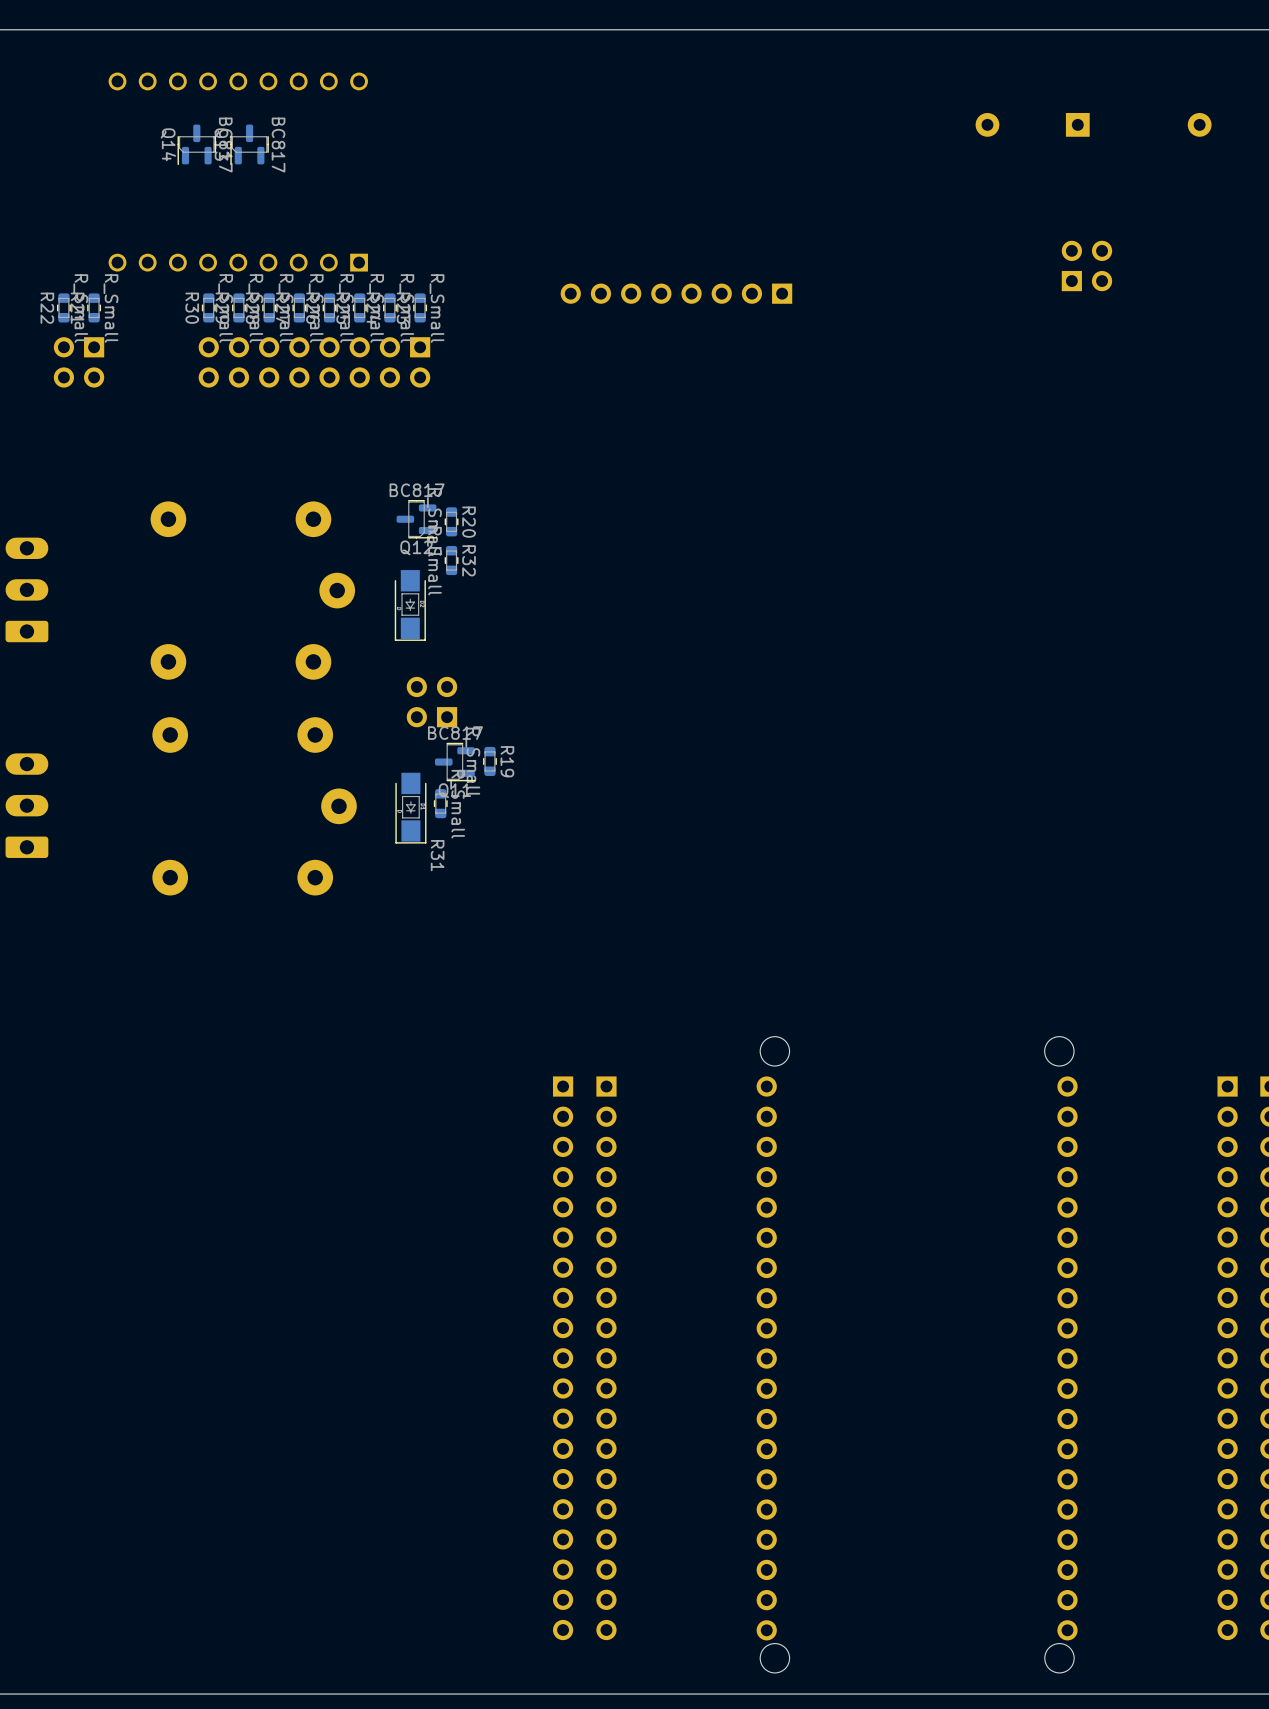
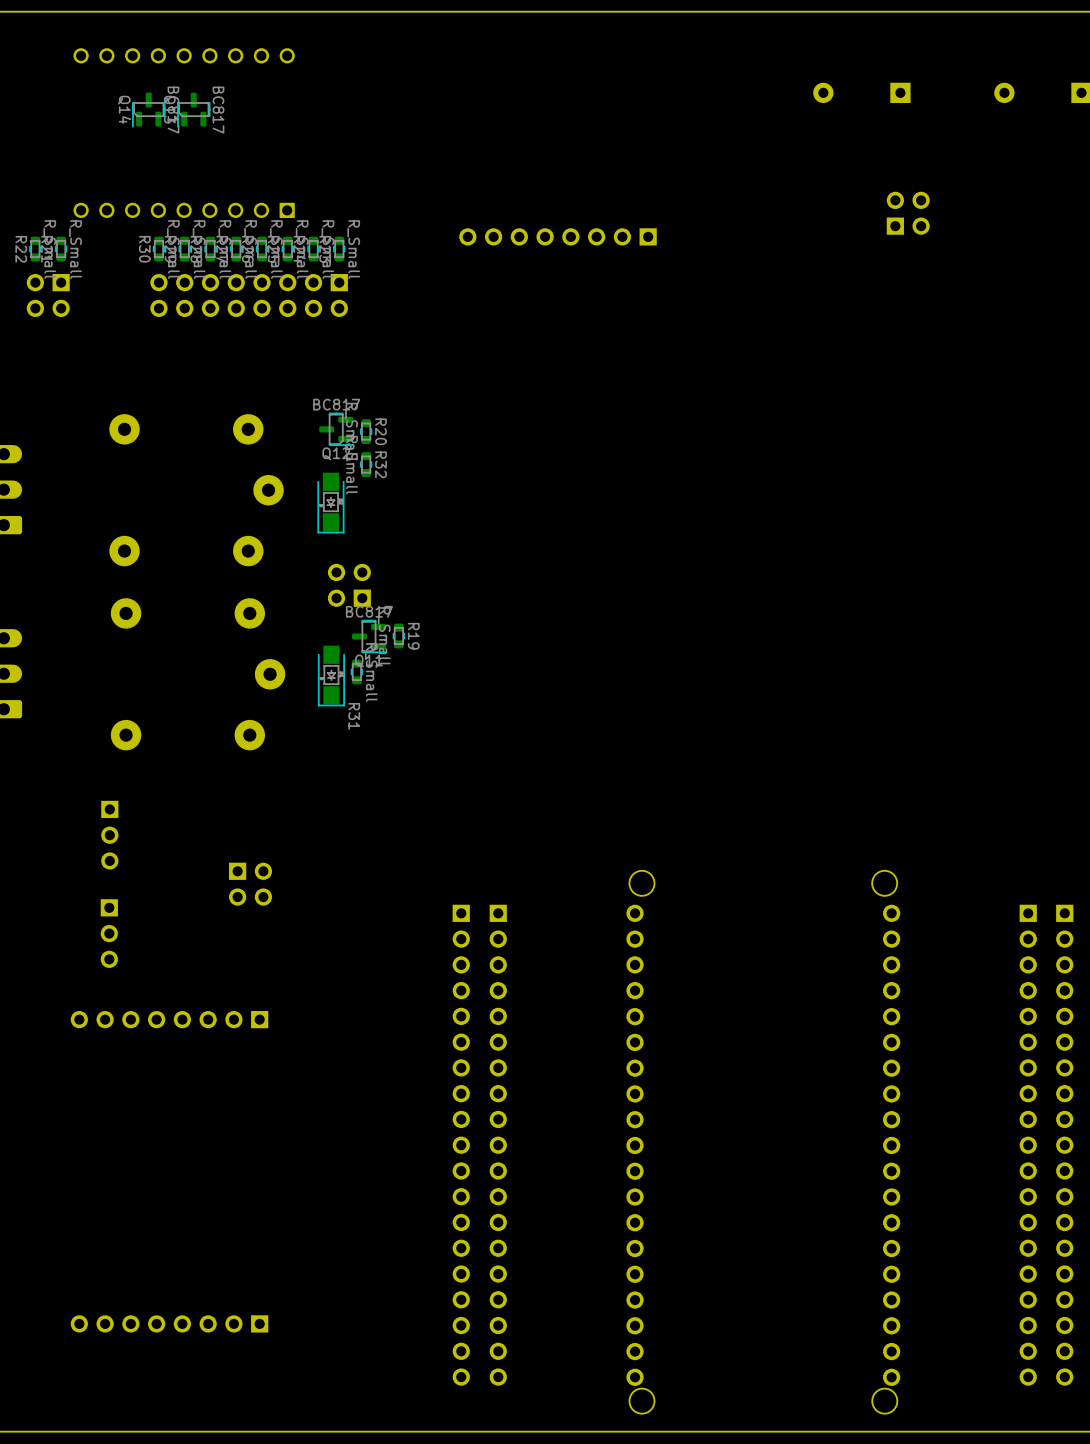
part: none -> (109, 835)
part: none -> (250, 884)
part: none -> (109, 933)
part: none -> (169, 1019)
part: none -> (169, 1323)

